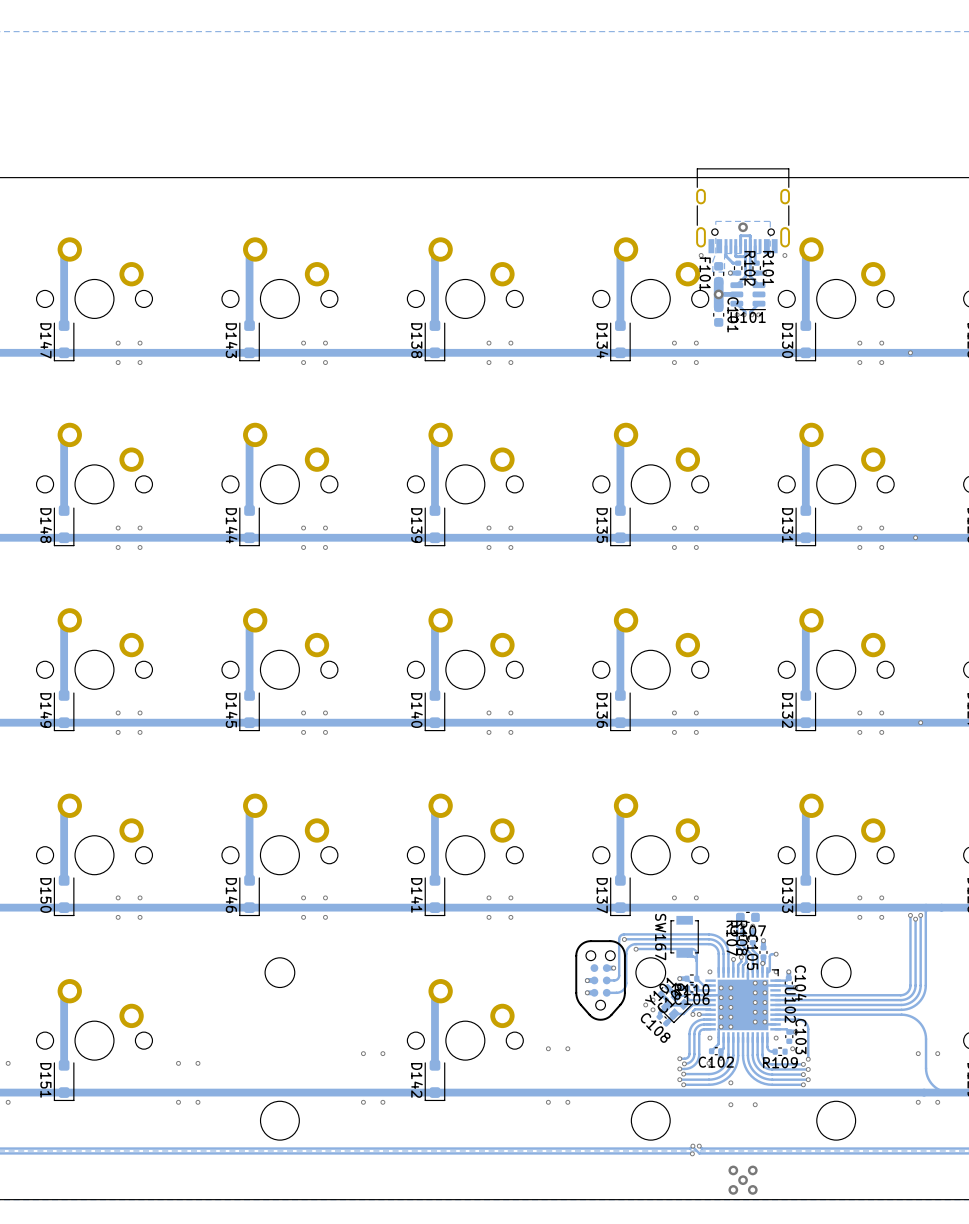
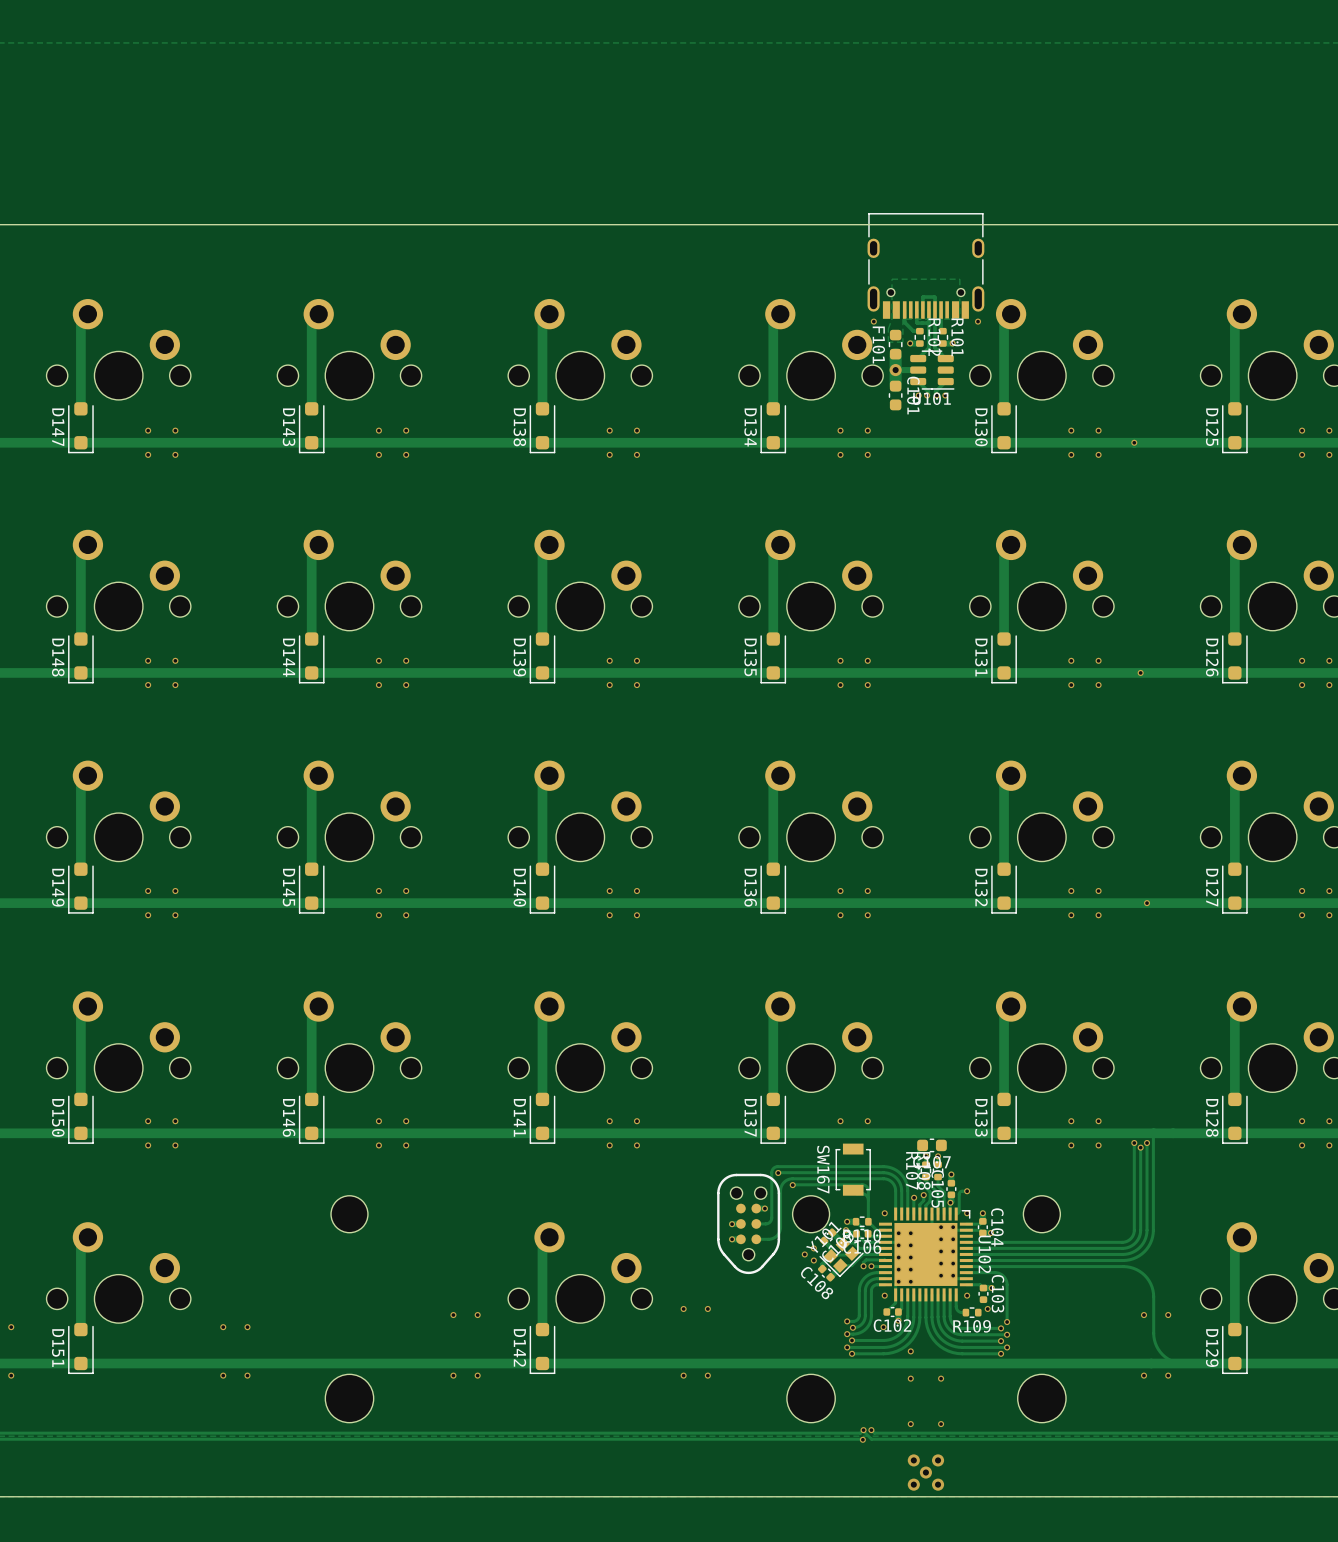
via: (743, 227) -> none
via: none -> (910, 1424)
via: none -> (941, 1424)

